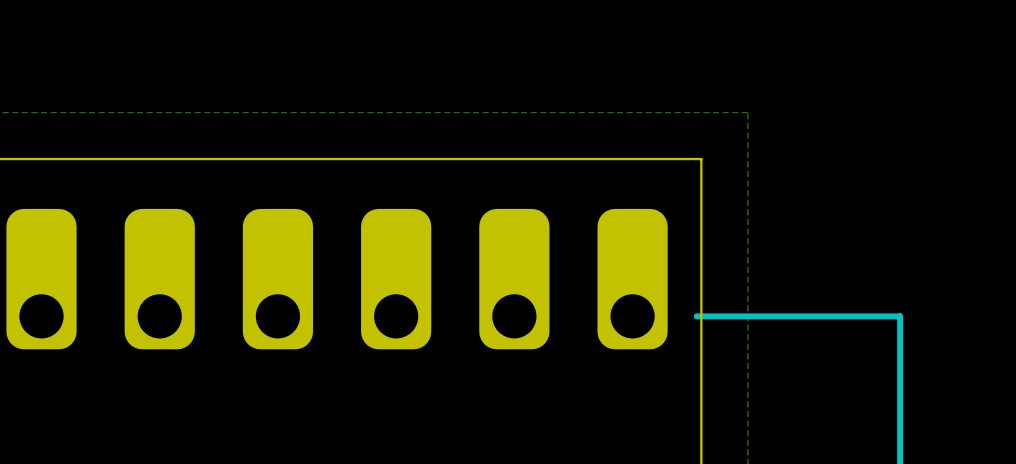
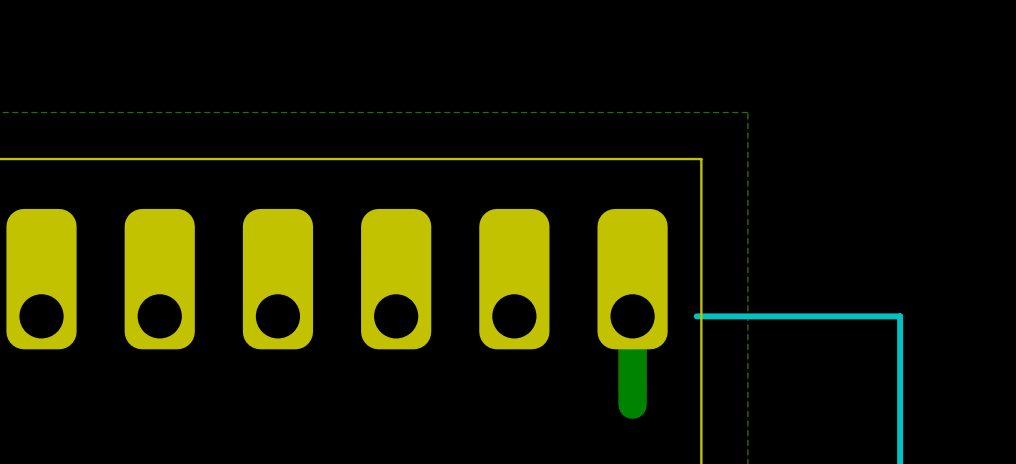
bottom track: none -> (632, 316) (632, 404)

